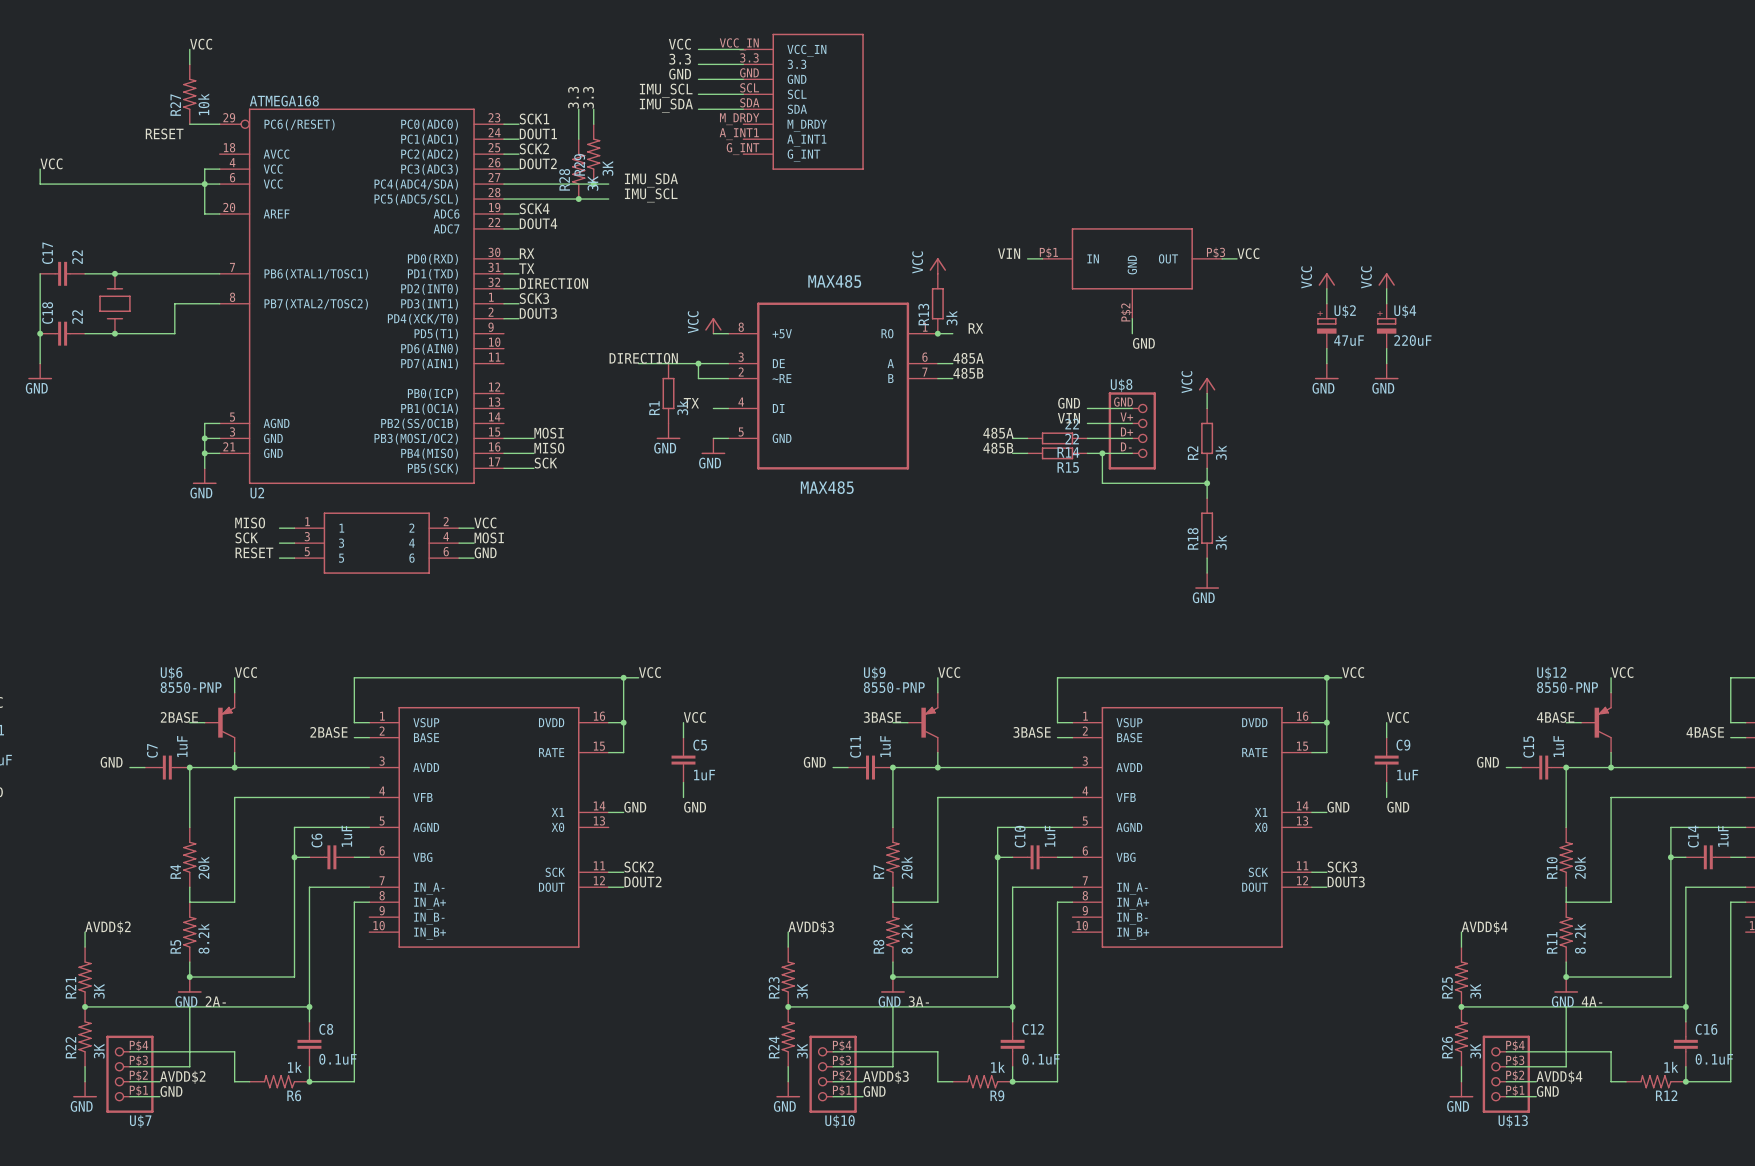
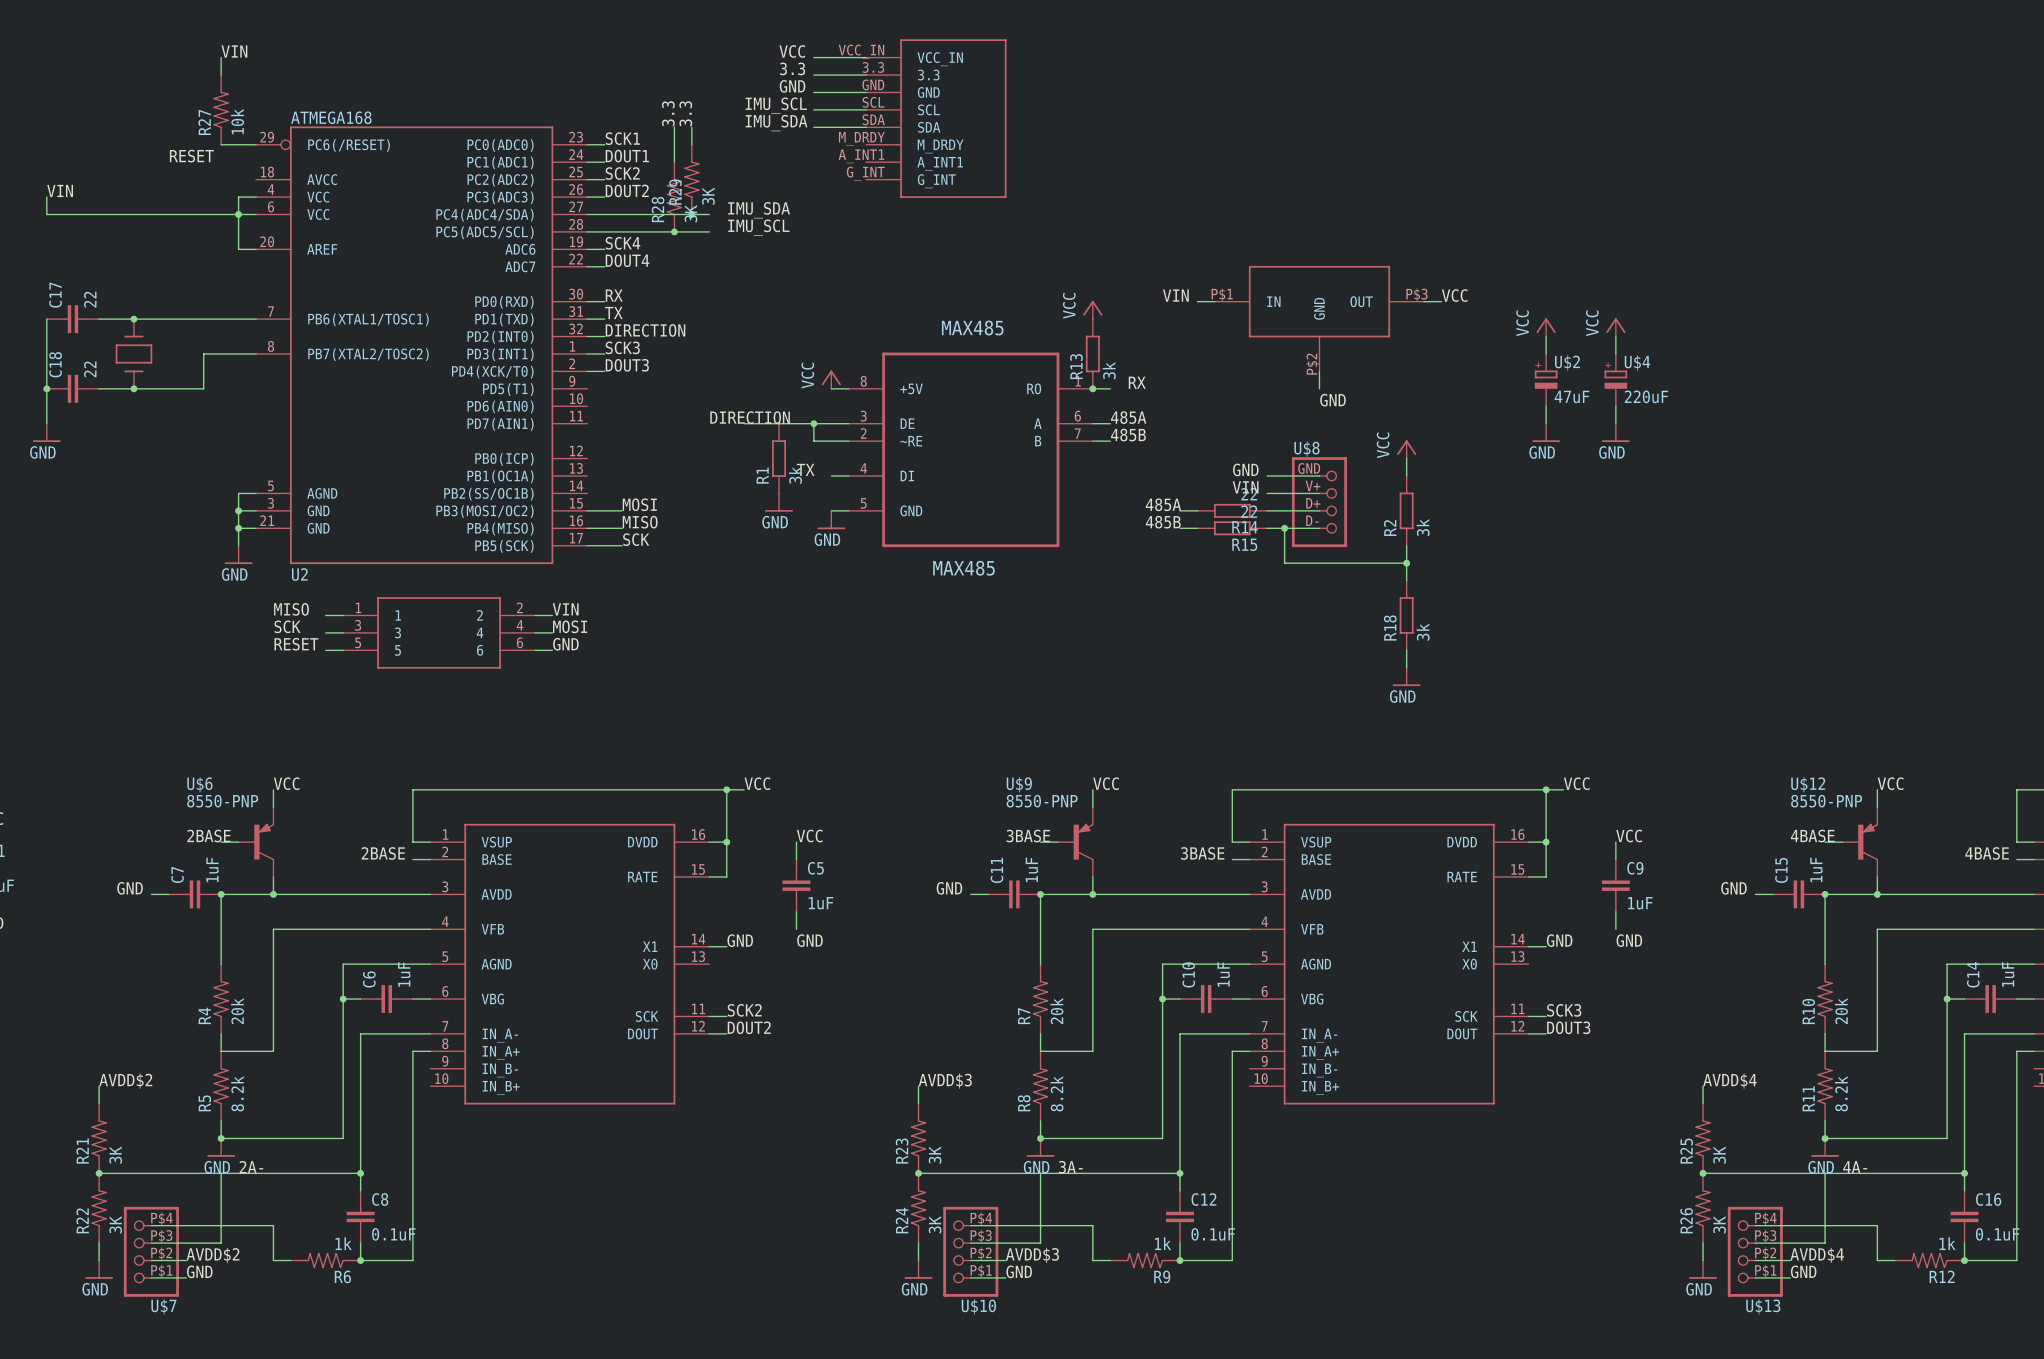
label: VCC (201, 44) -> VIN (234, 51)
label: VCC (51, 163) -> VIN (60, 190)
label: VCC (485, 522) -> VIN (565, 609)

